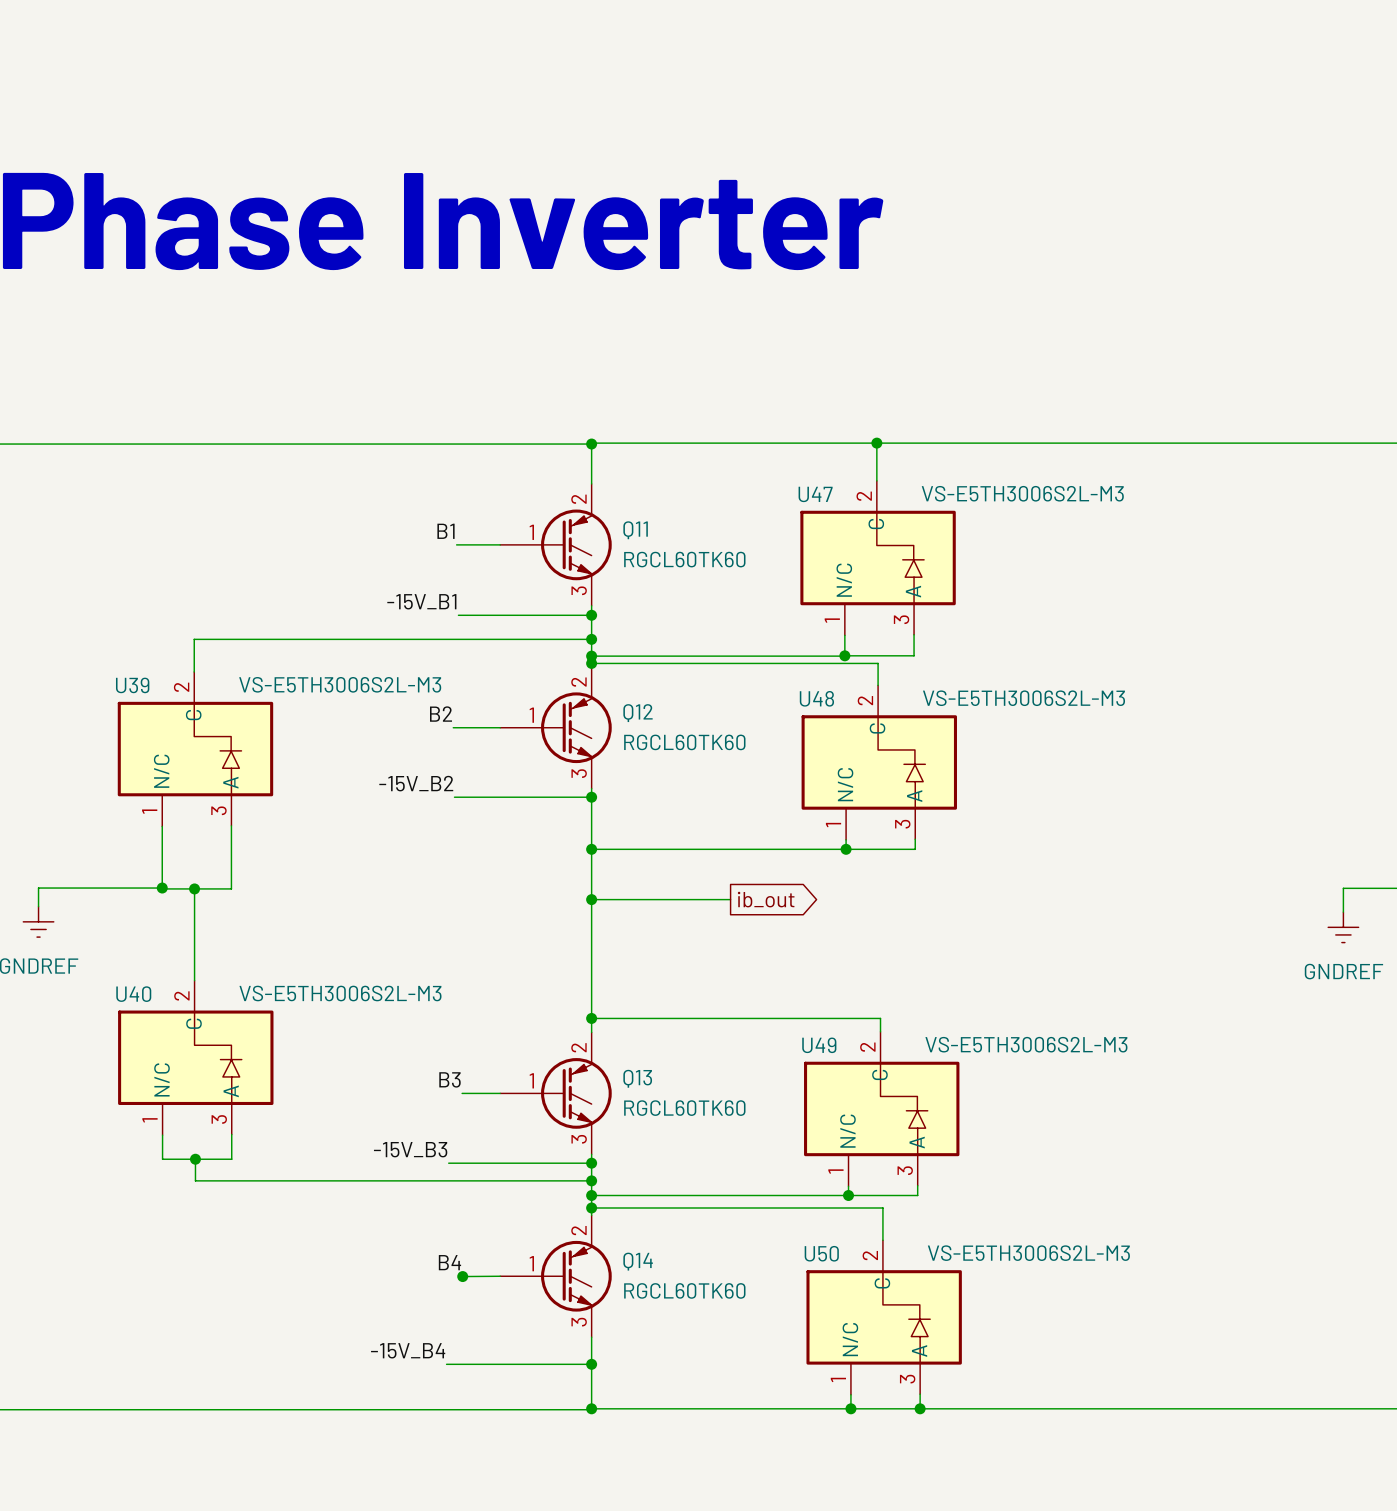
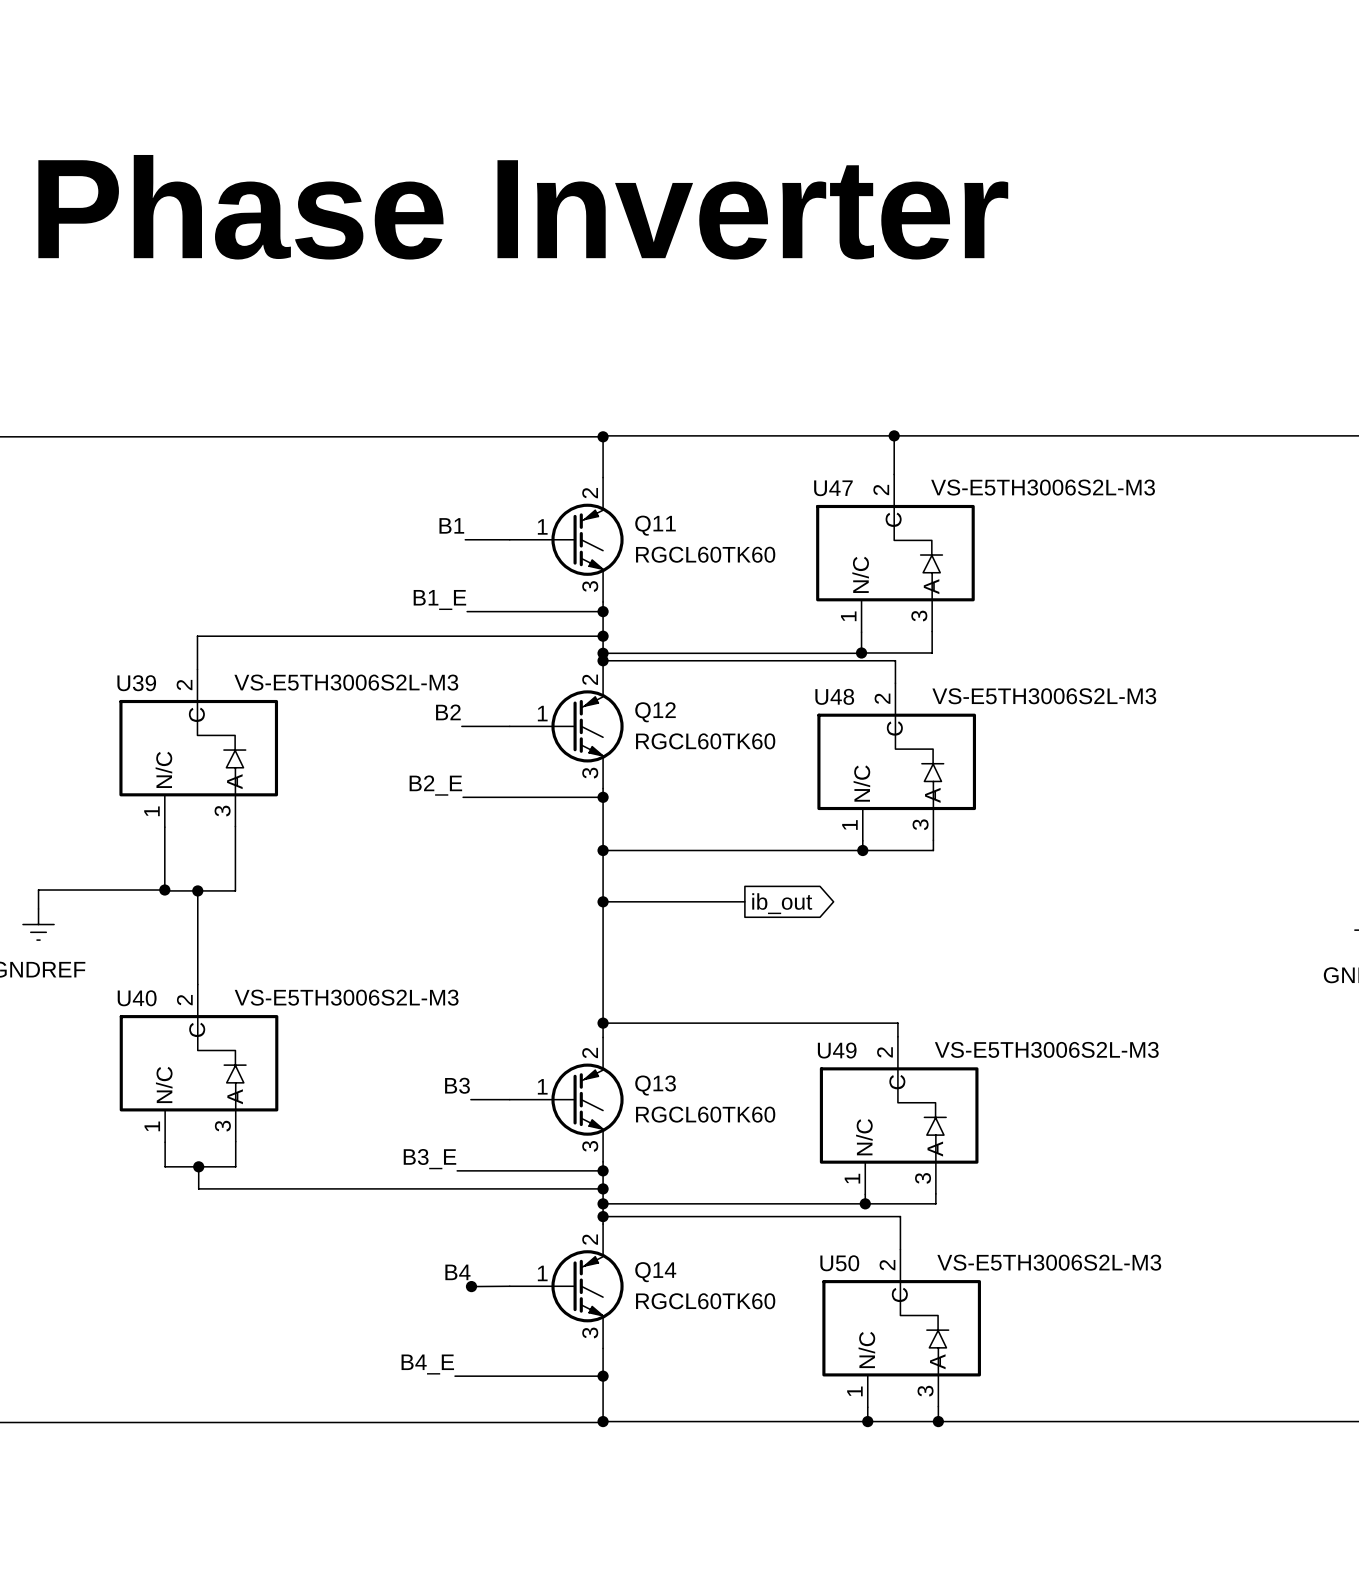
label: -15V_B1 (421, 601) -> B1_E (439, 599)
label: -15V_B2 (416, 783) -> B2_E (435, 785)
label: -15V_B3 (410, 1149) -> B3_E (429, 1159)
label: -15V_B4 (408, 1350) -> B4_E (427, 1364)

